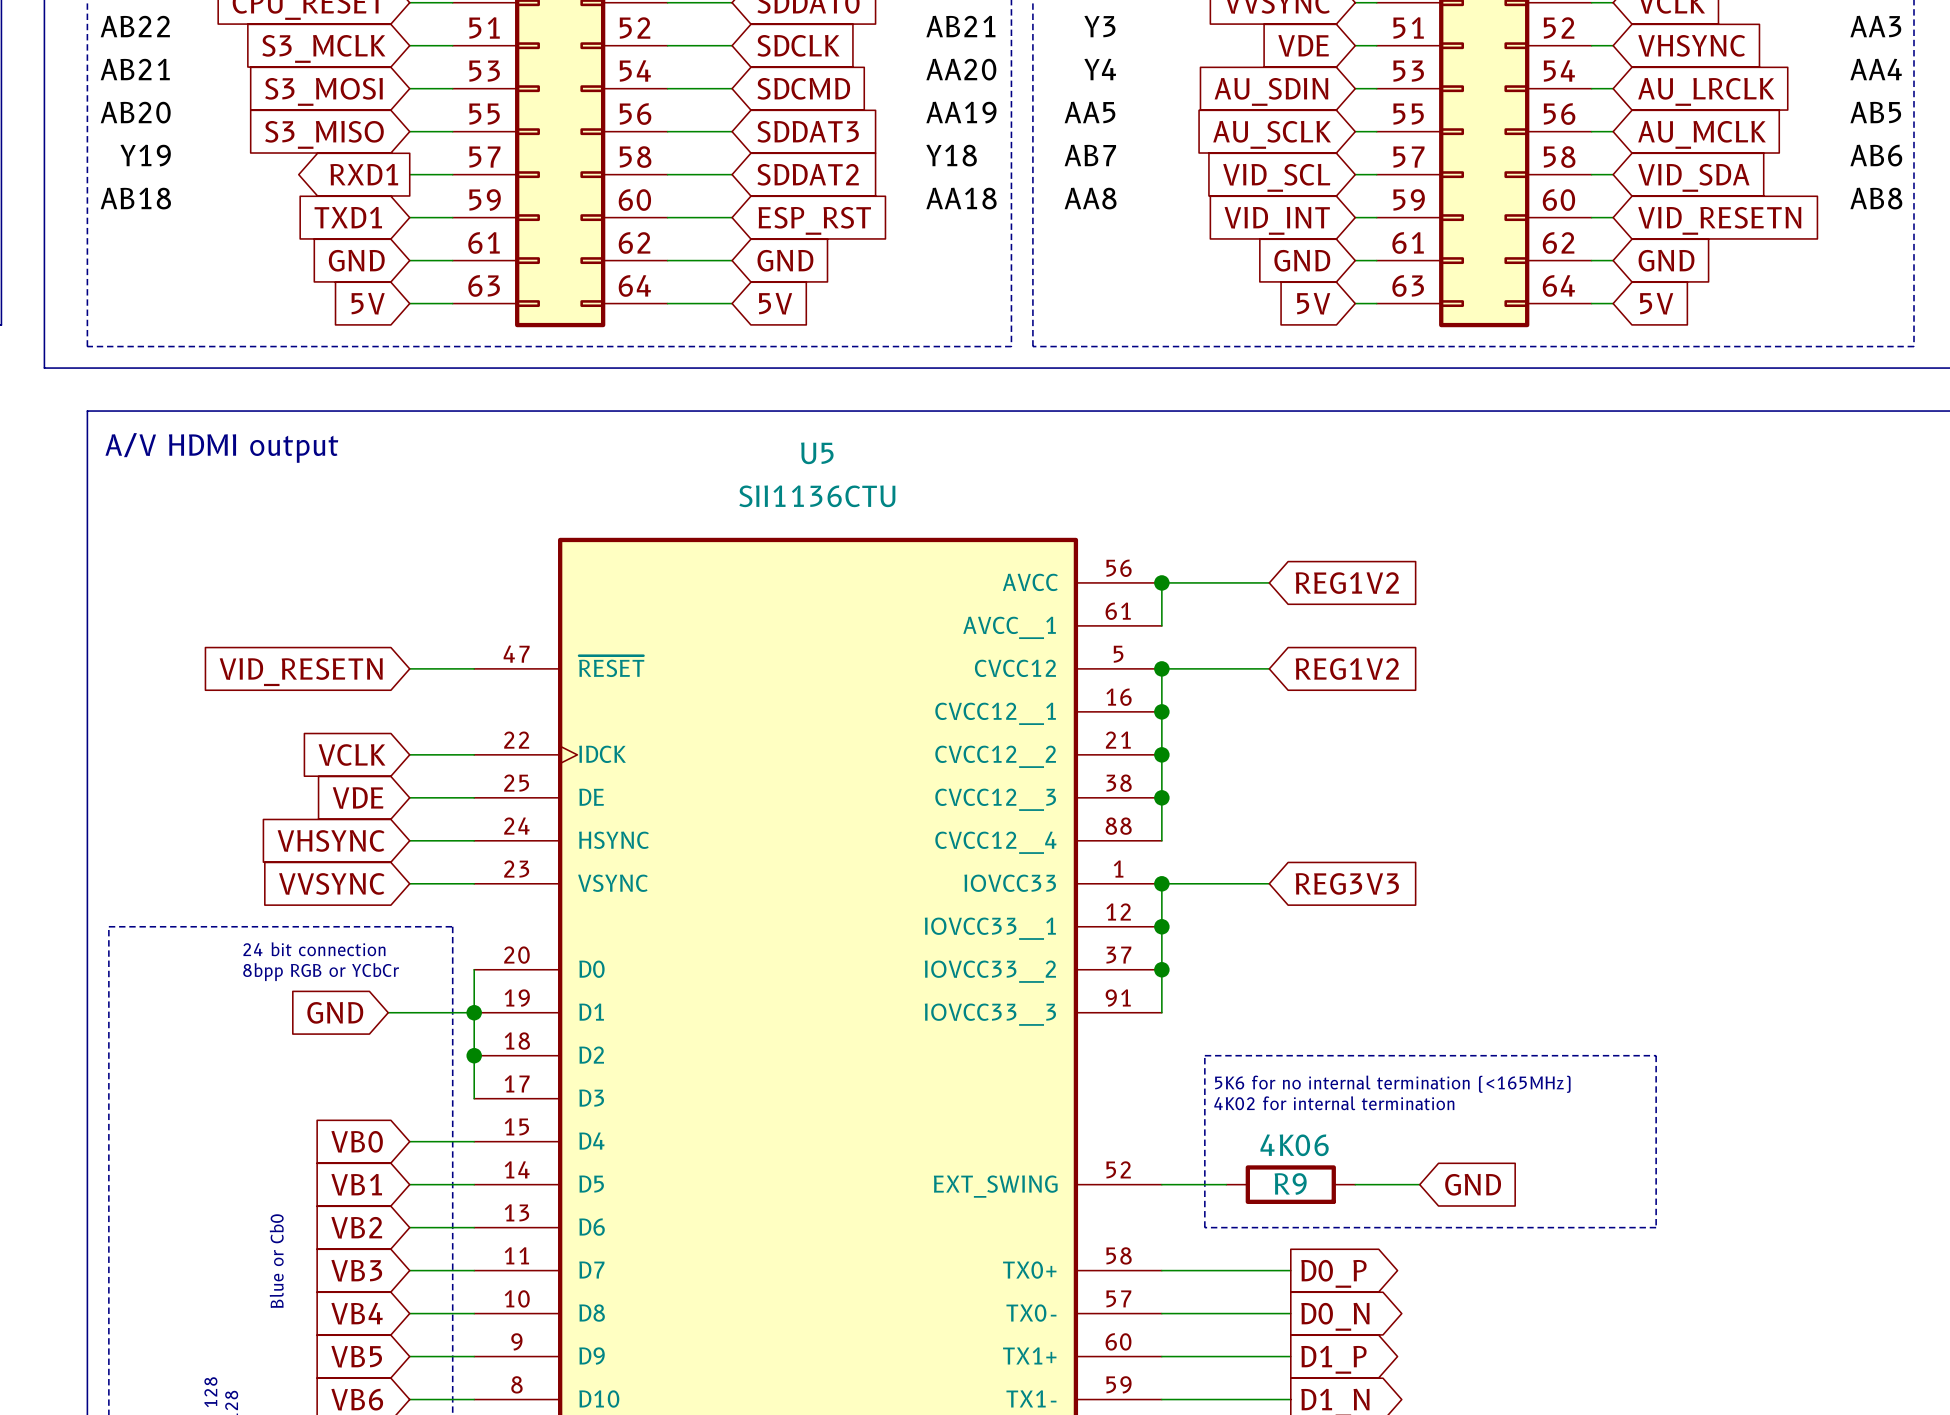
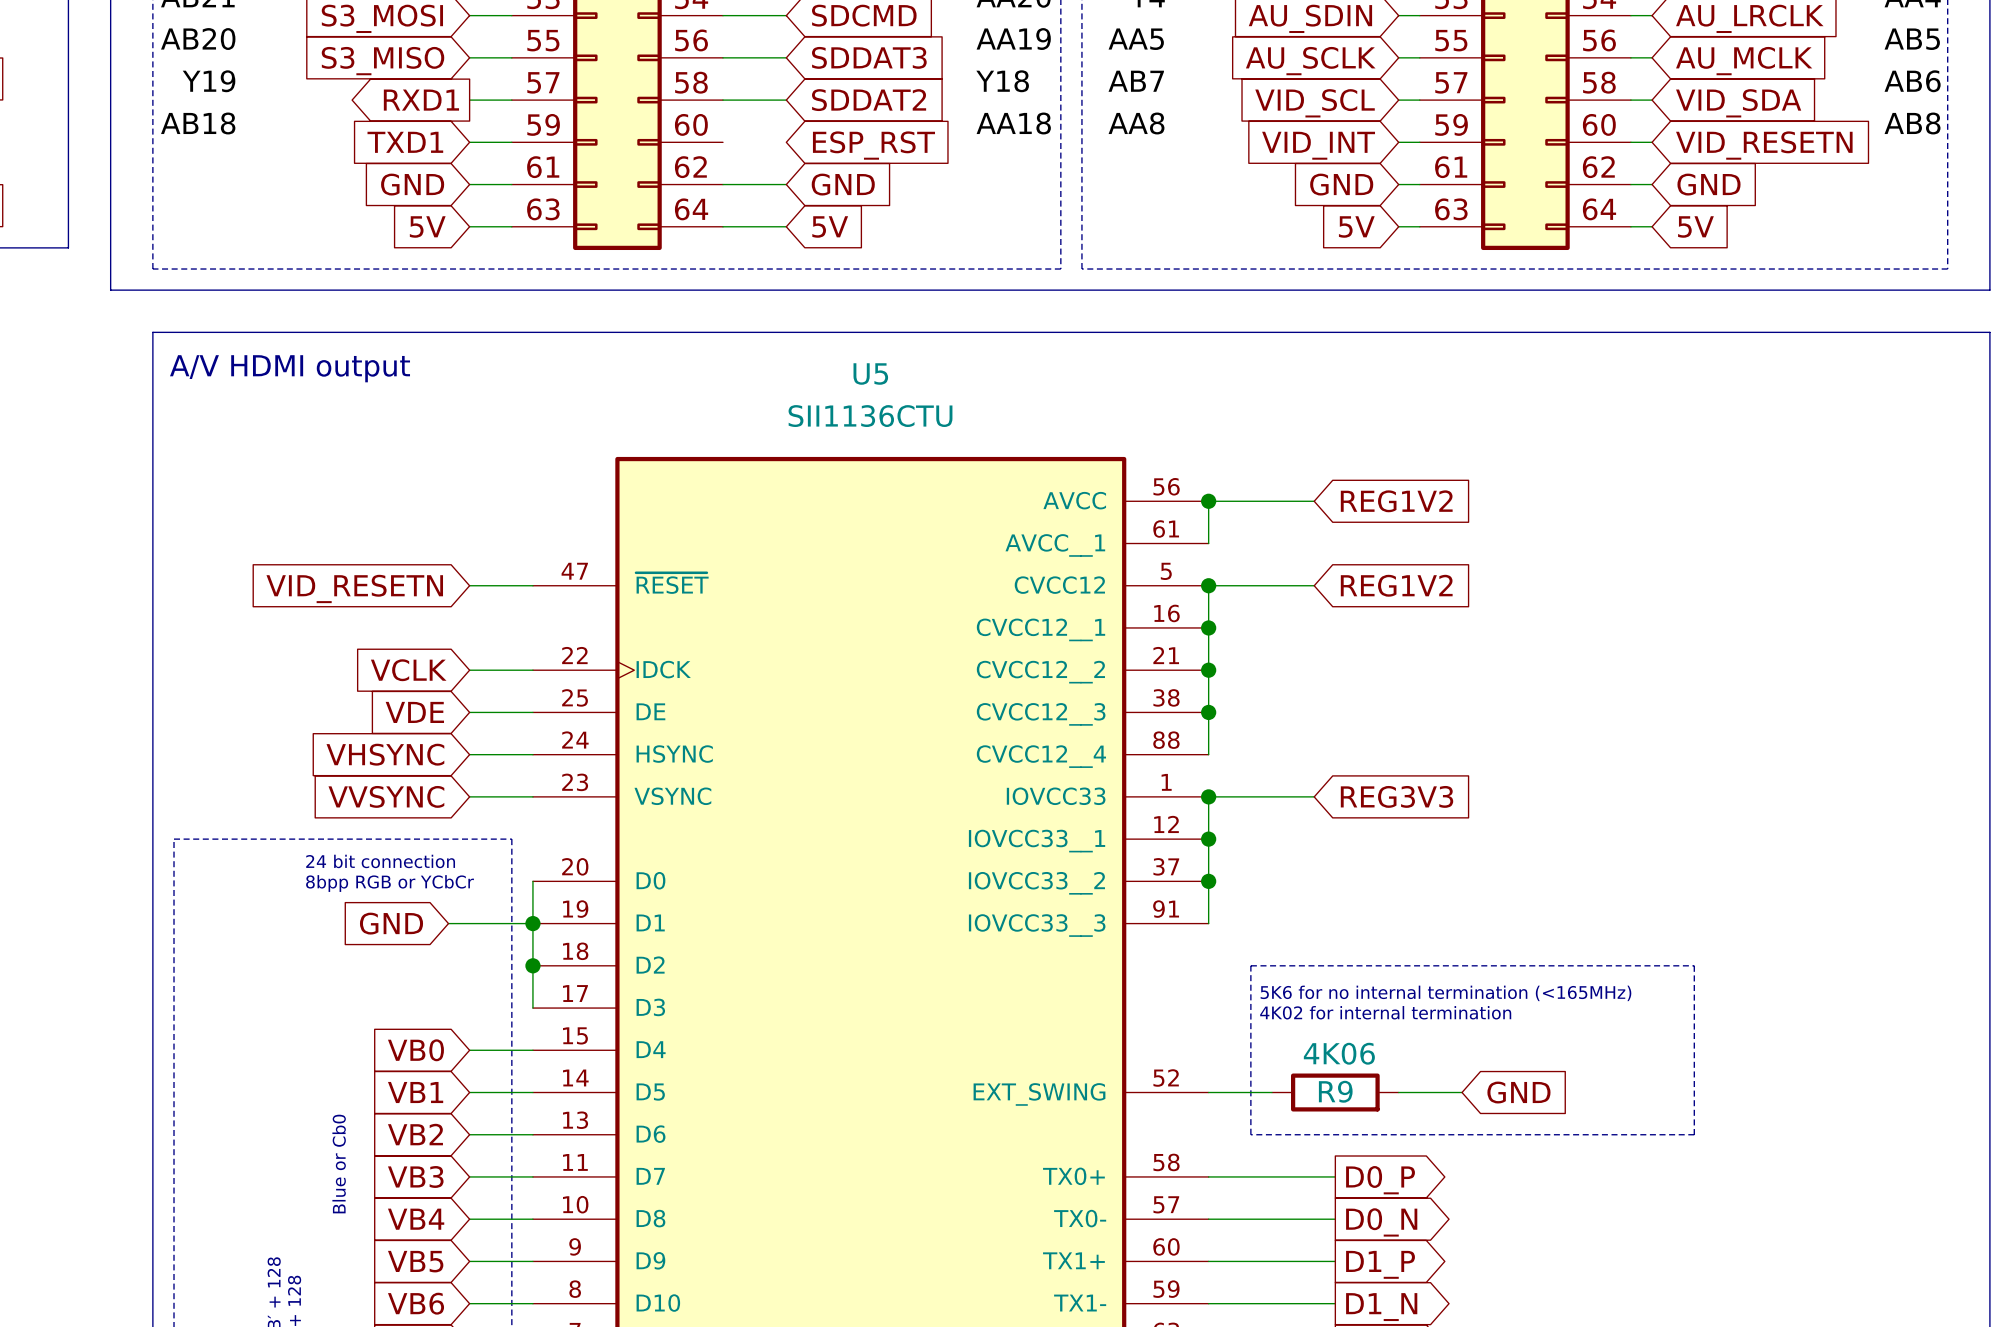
wire: (667, 217) (732, 217) -> none

